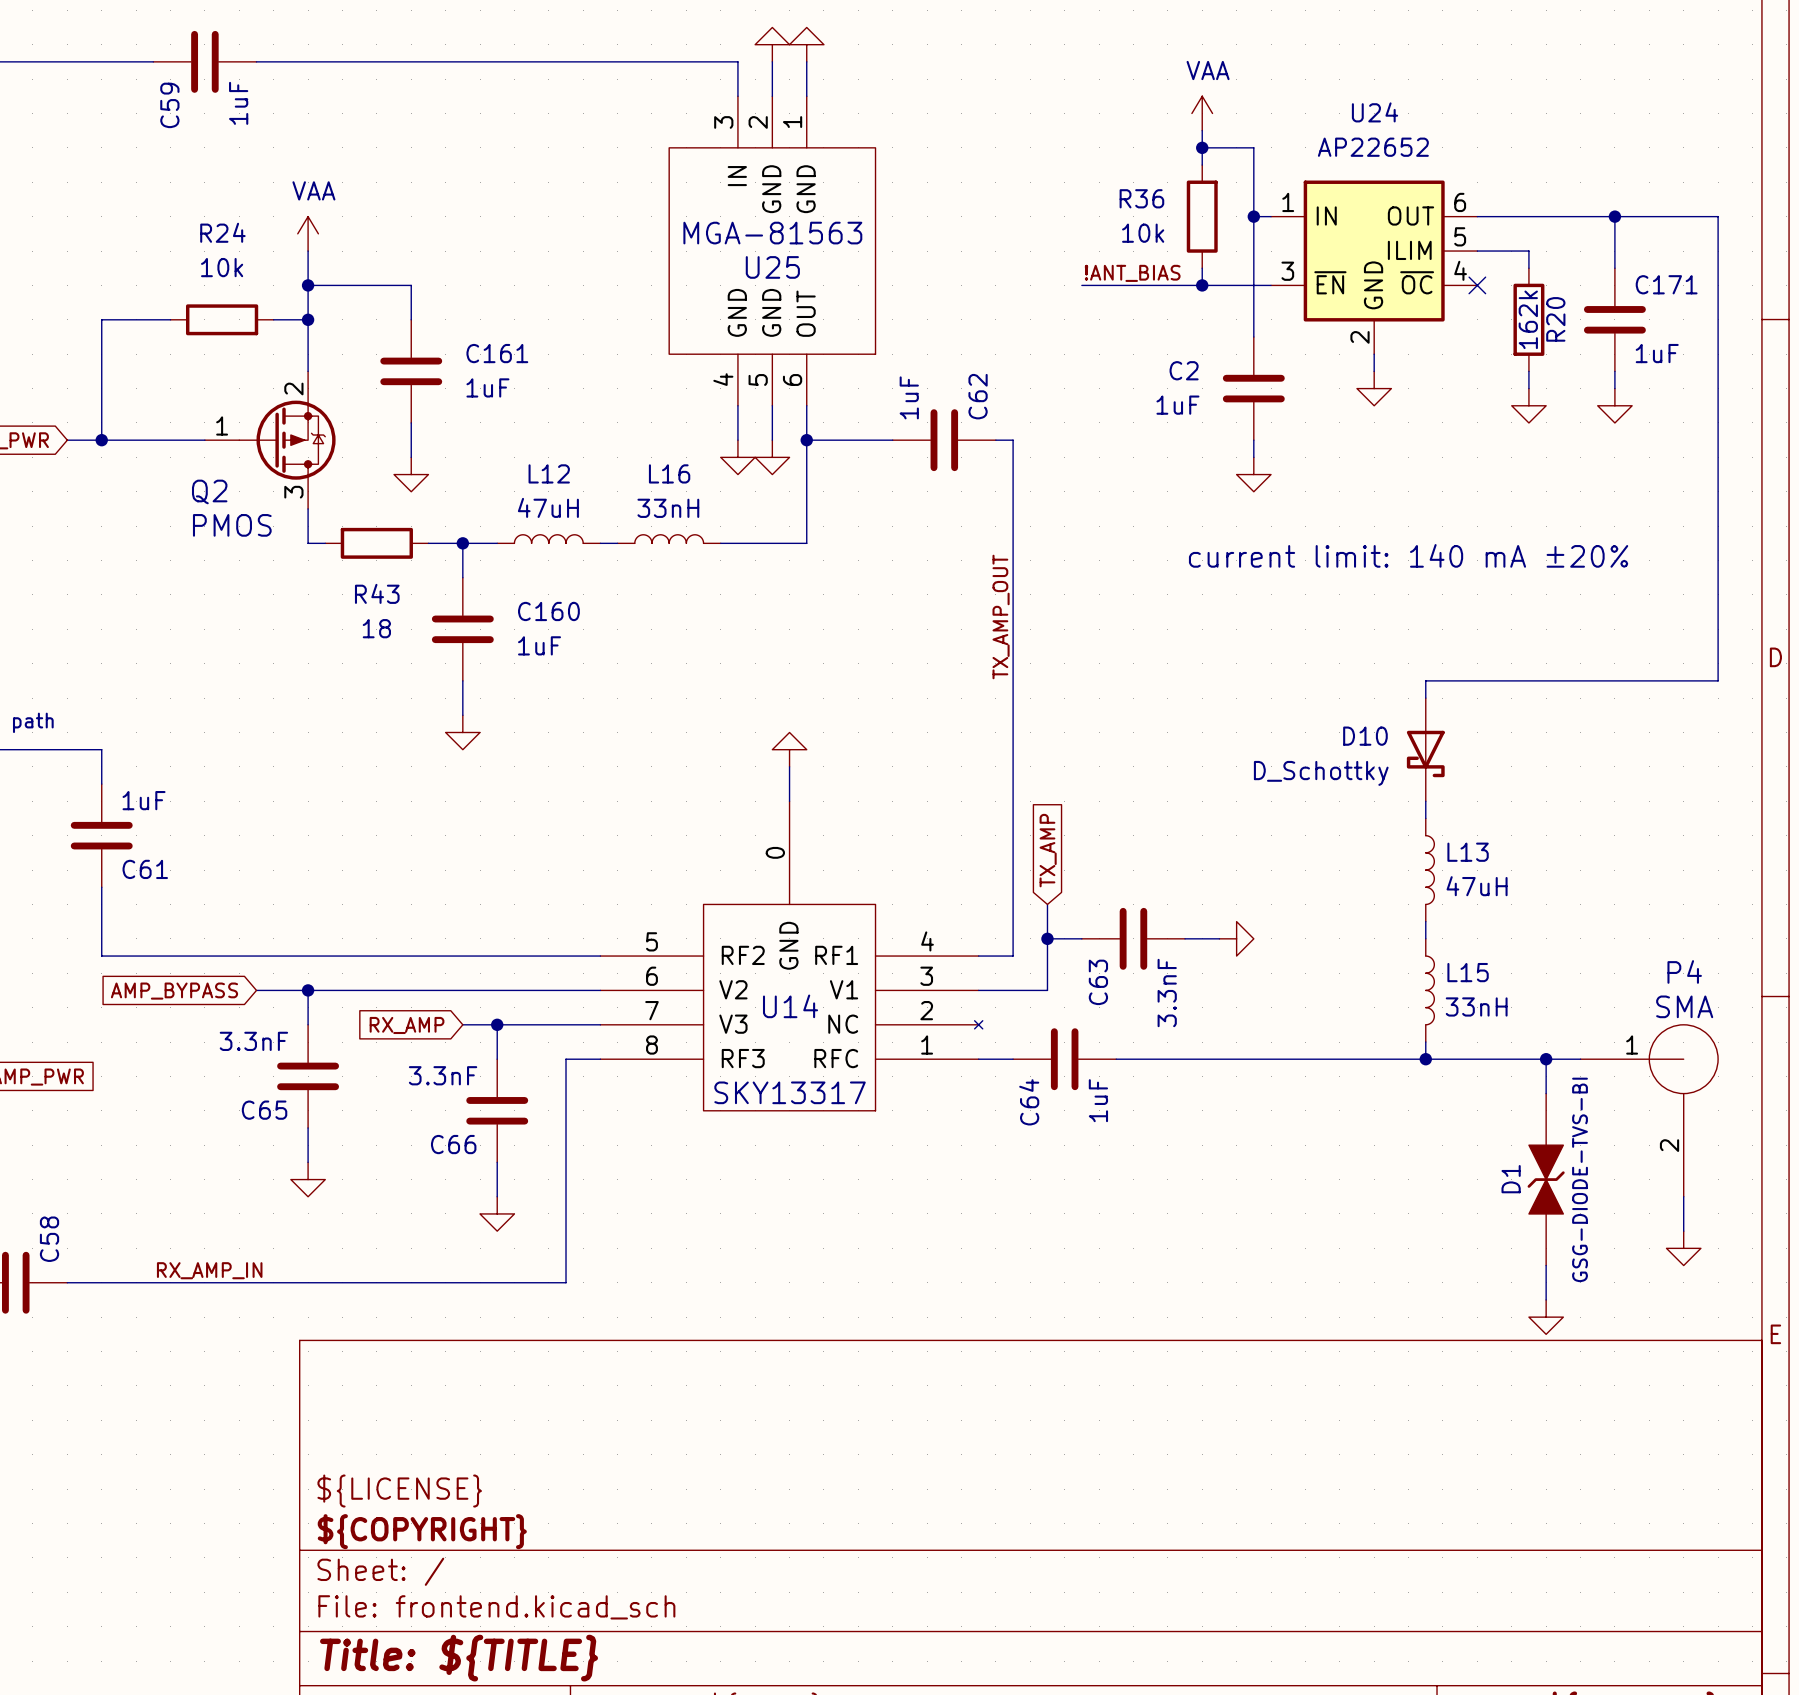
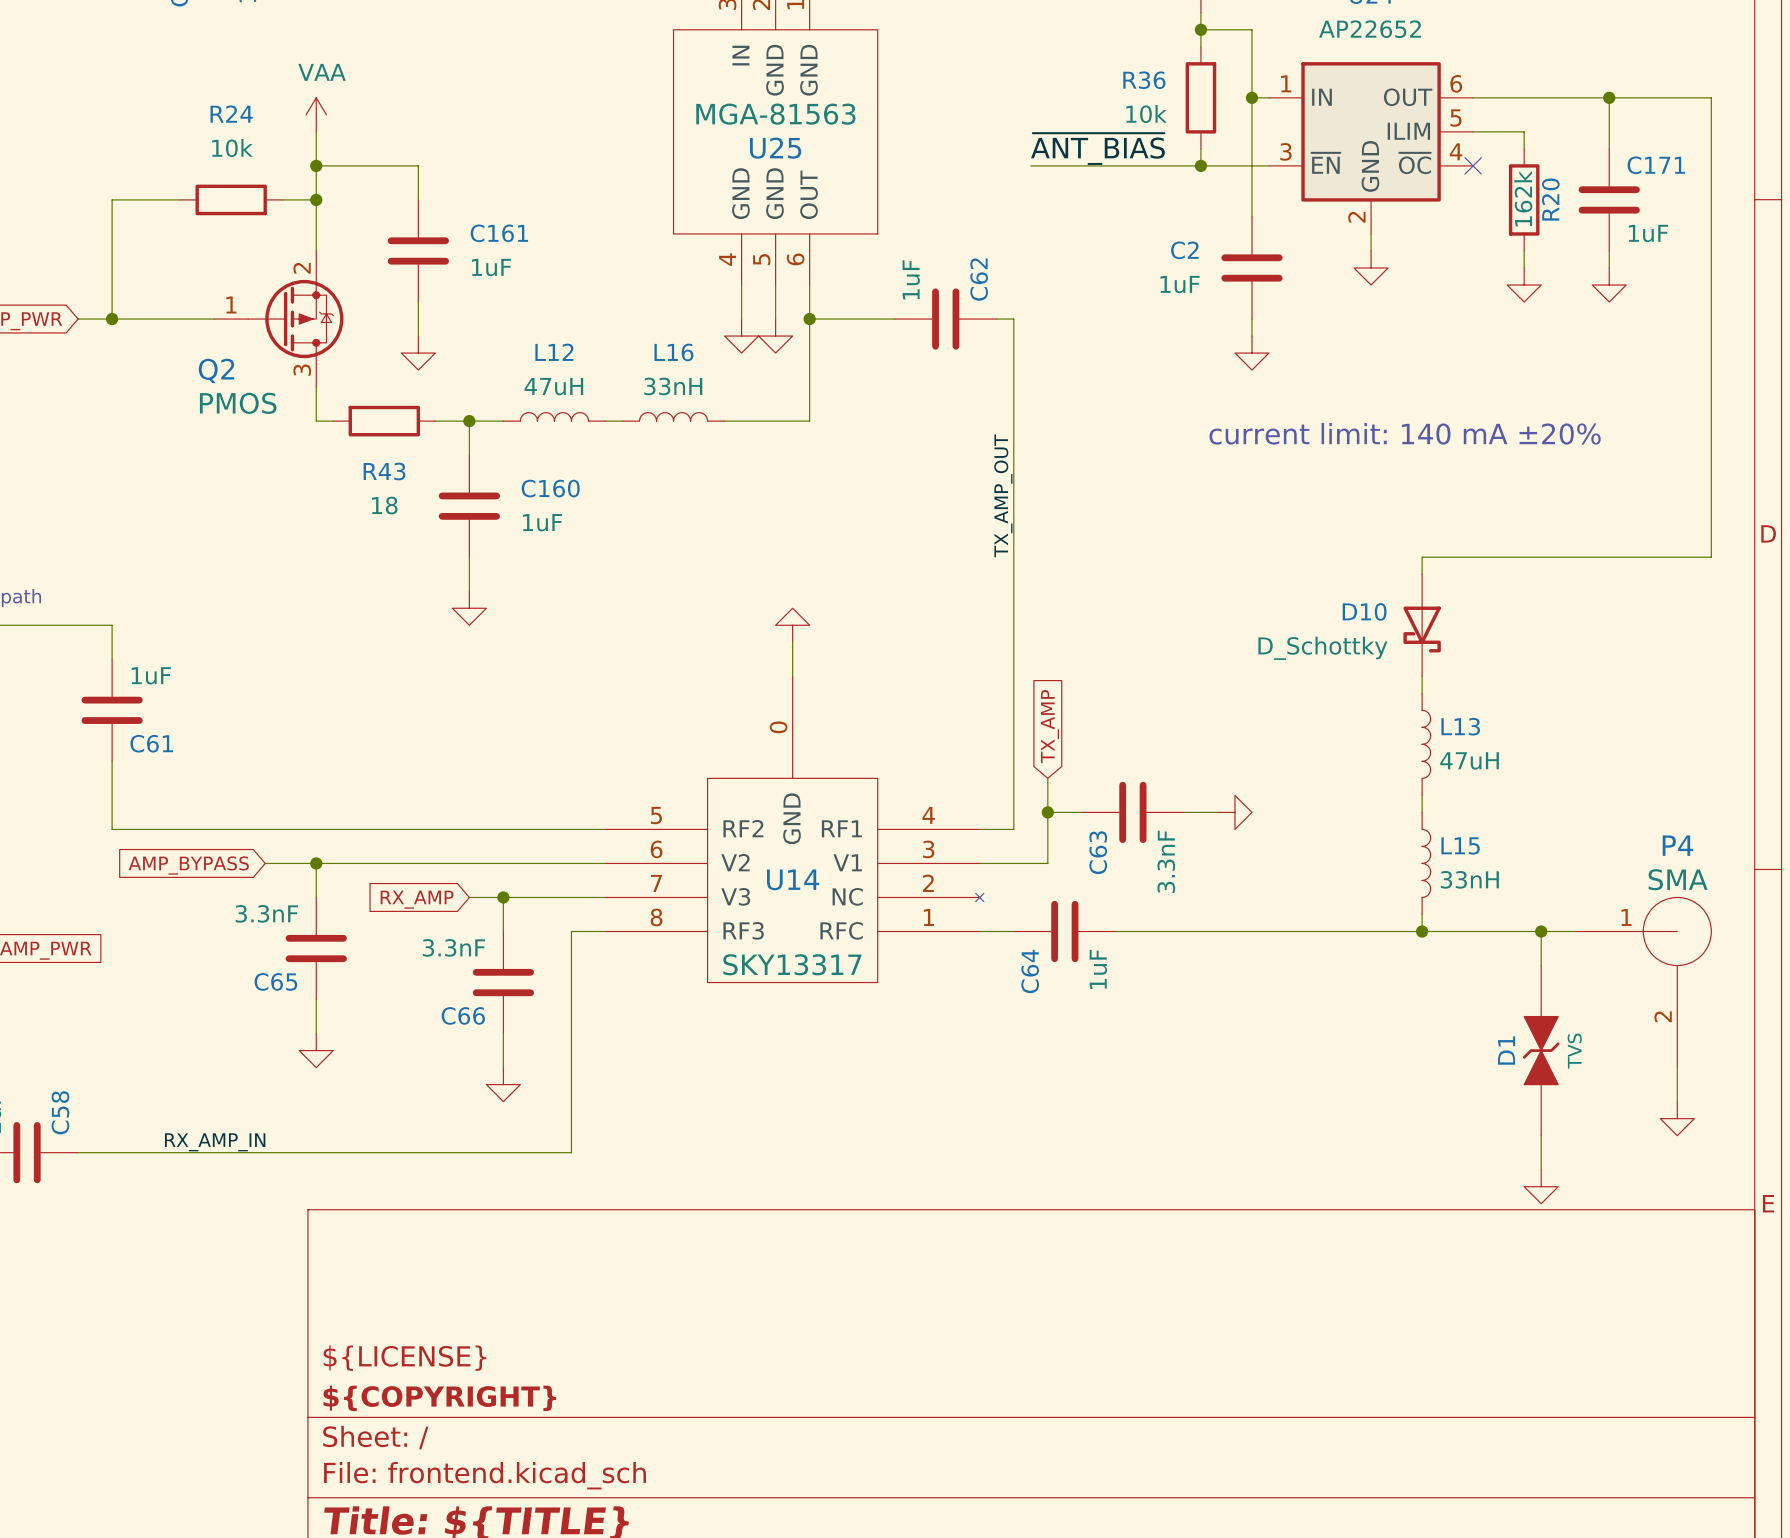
label: !ANT_BIAS (1132, 273) -> ~{ANT_BIAS} (1097, 149)
wire: none -> (1030, 165) (1081, 165)
D1 value: GSG-DIODE-TVS-BI (1580, 1179) -> TVS (1574, 1051)

